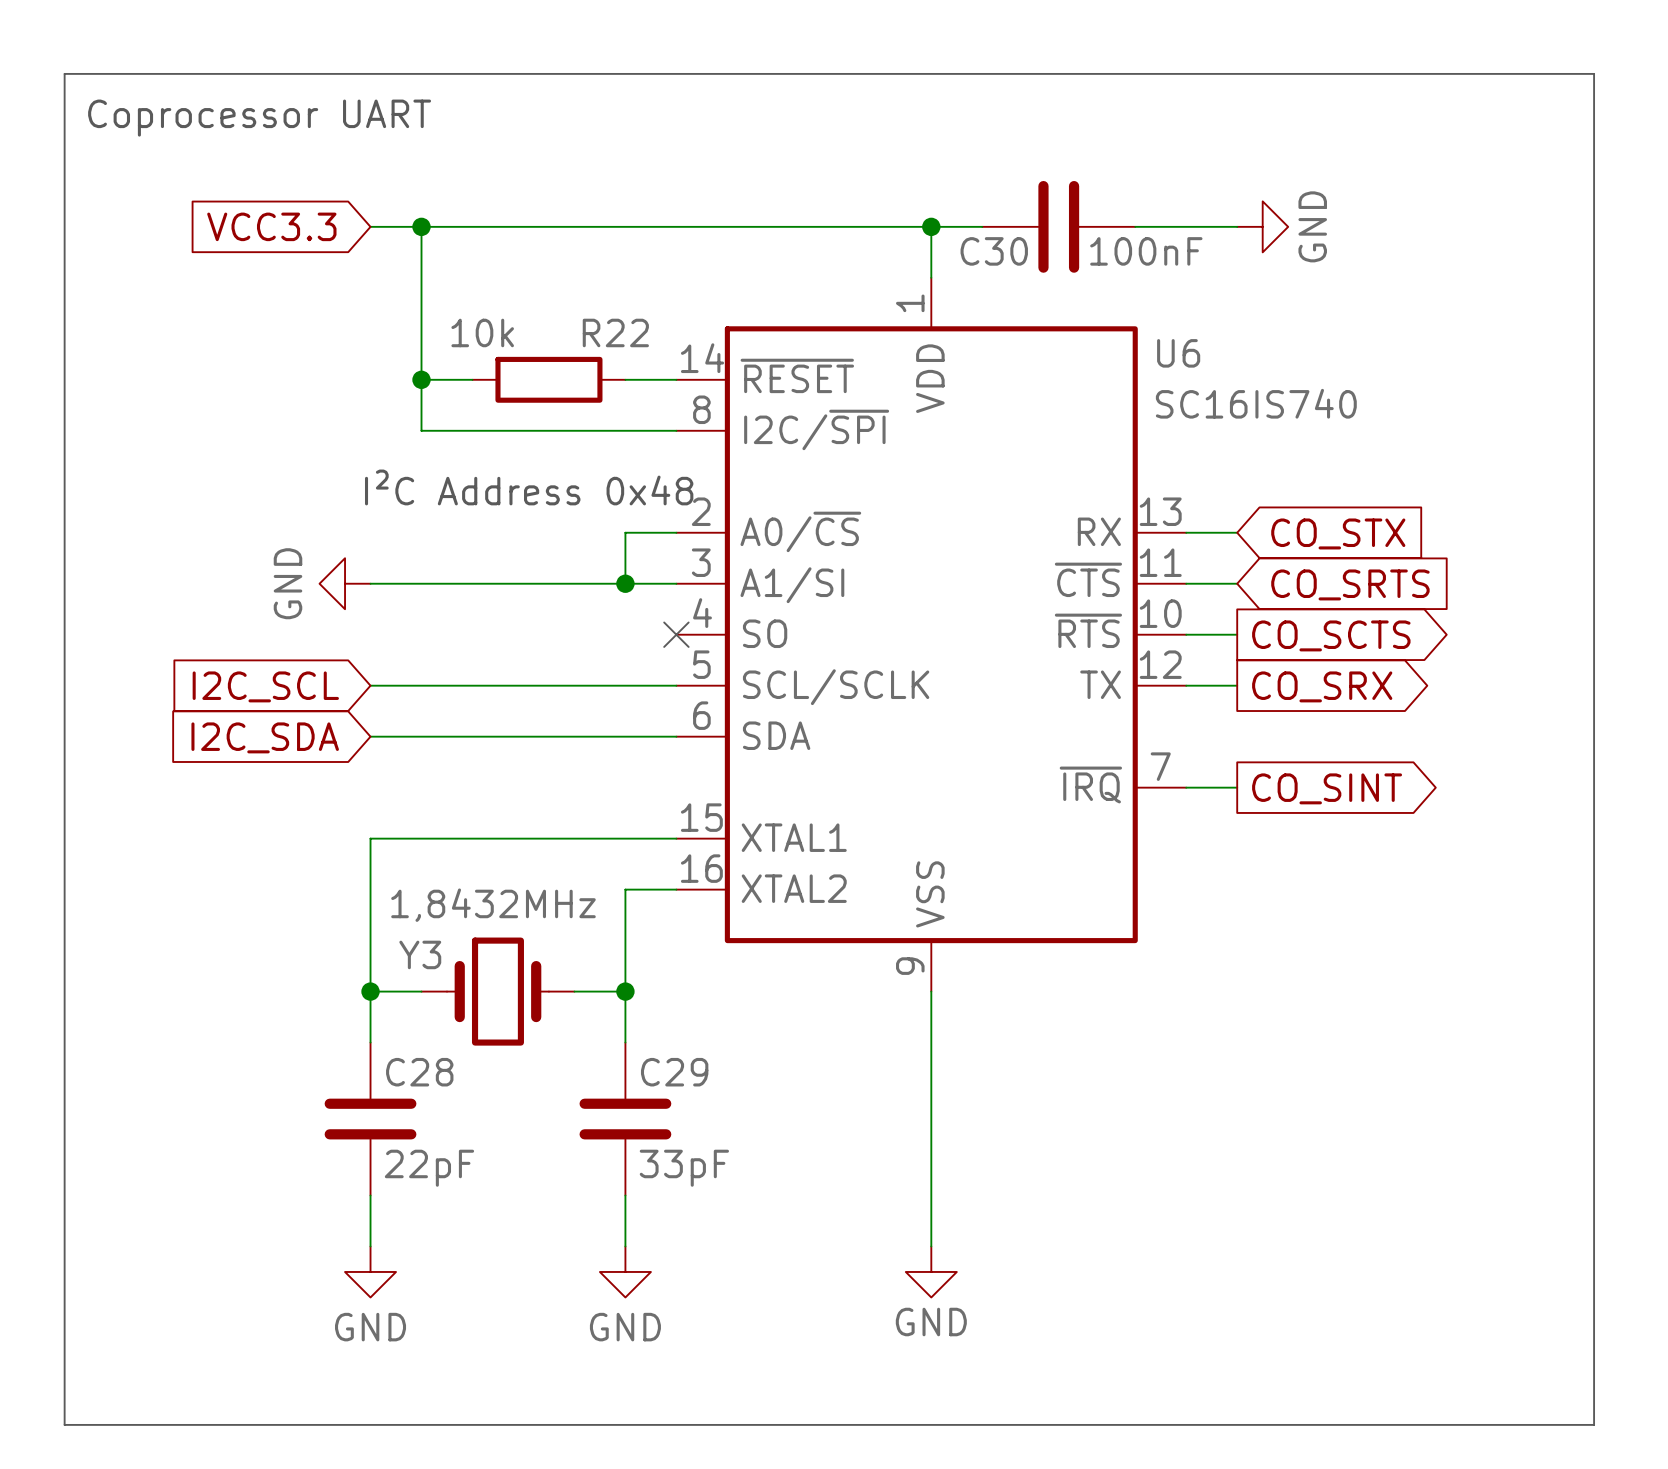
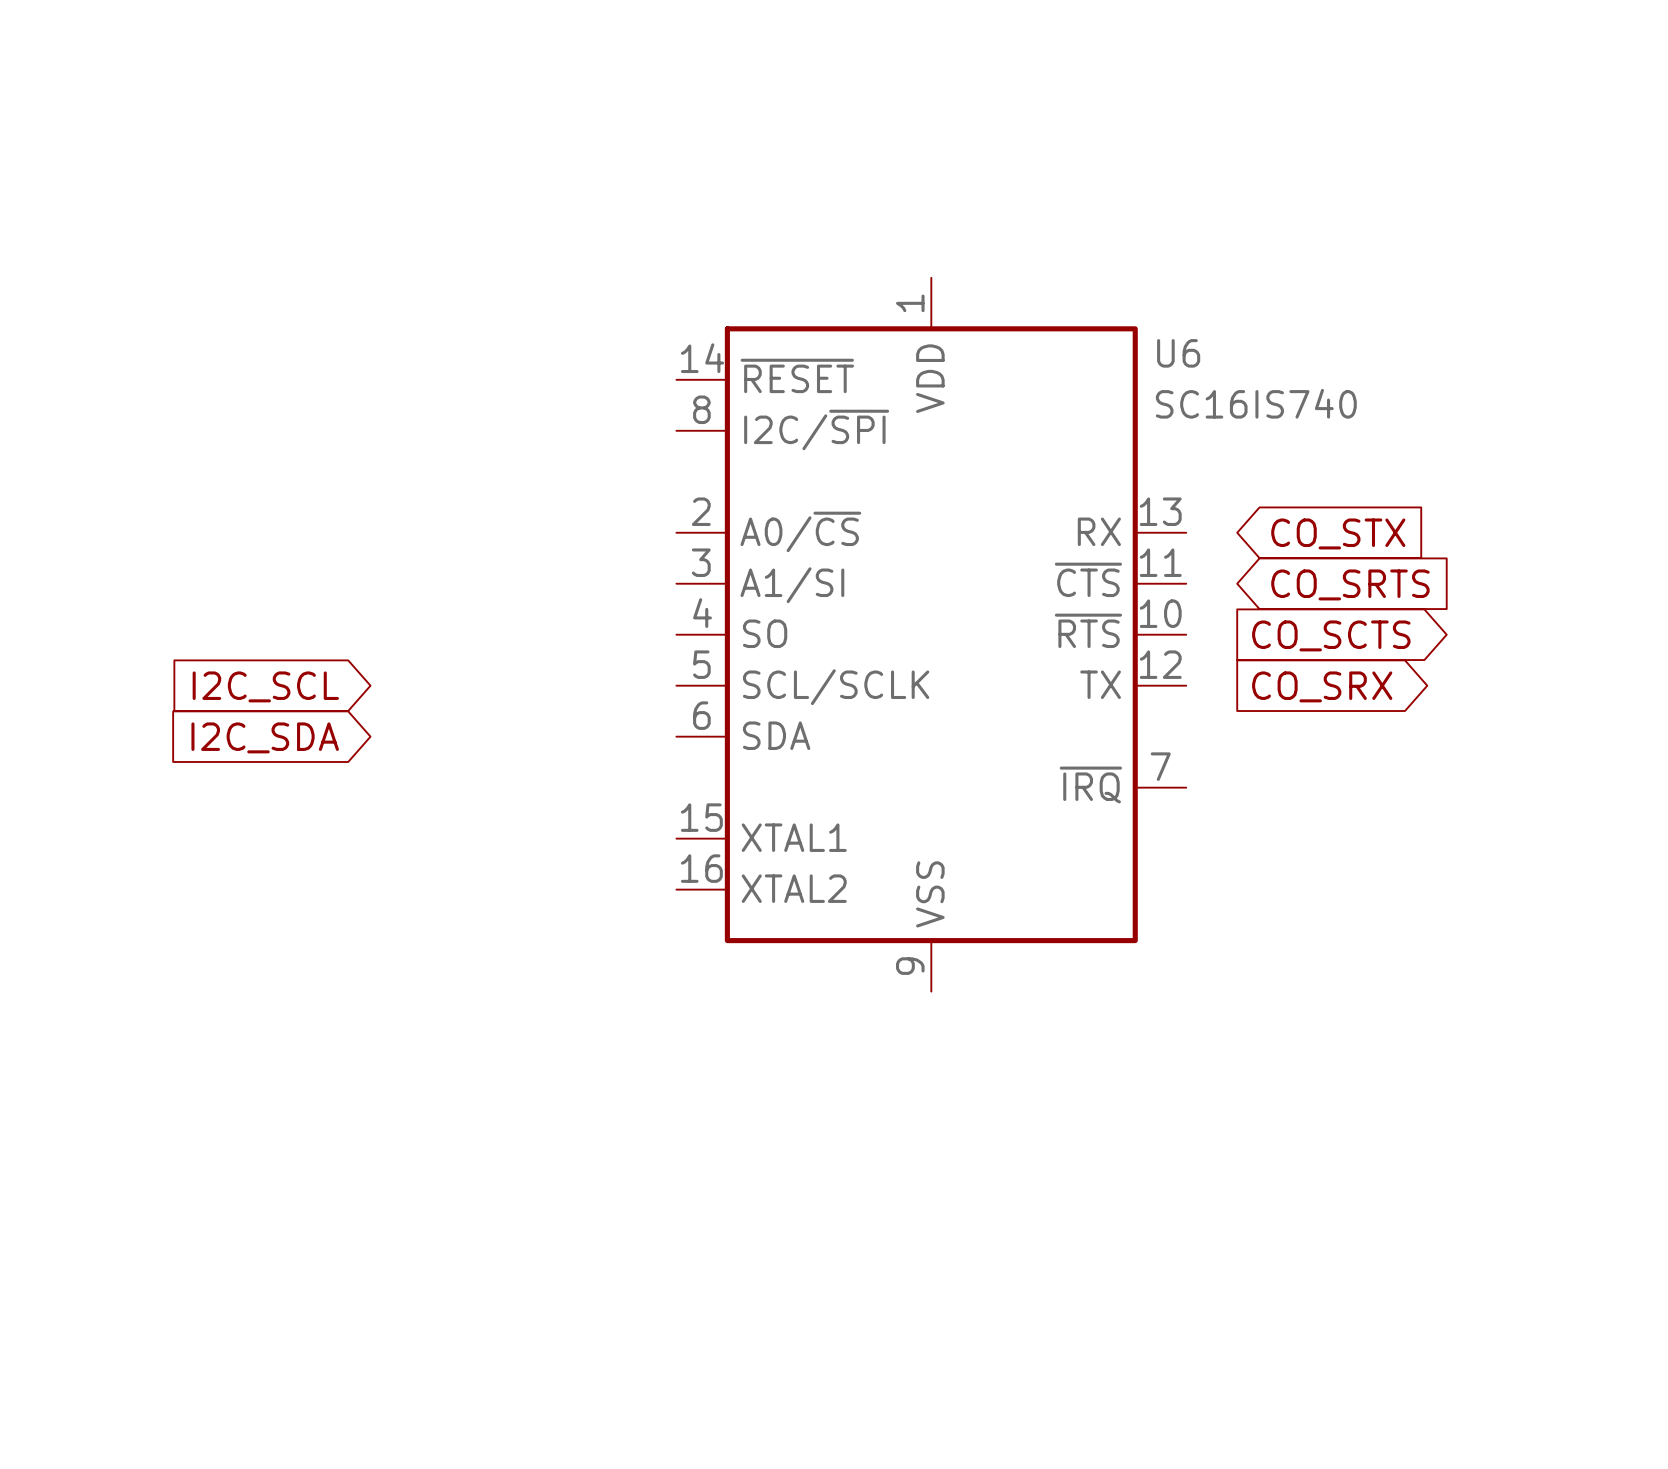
line: (64, 73) (1594, 73) (1594, 1424) (64, 1424) (64, 73) -> none
text: Coprocessor UART (259, 118) -> none
global label: VCC3.3 (271, 226) -> none
wire: (370, 226) (982, 226) -> none
wire: (421, 226) (421, 430) (676, 430) -> none
junction: (421, 226) -> none
wire: (931, 226) (931, 277) -> none
junction: (931, 226) -> none
C30: 100nF (1058, 226) -> none
wire: (1135, 226) (1237, 226) -> none
power symbol: GND (1262, 226) -> none
wire: (421, 379) (472, 379) -> none
junction: (421, 379) -> none
R22: 10k (548, 379) -> none
wire: (625, 379) (676, 379) -> none
text: I²C Address 0x48 (529, 487) -> none
wire: (676, 532) (625, 532) (625, 583) -> none
wire: (1186, 532) (1237, 532) -> none
power symbol: GND (345, 583) -> none
wire: (370, 583) (676, 583) -> none
junction: (625, 583) -> none
wire: (1186, 583) (1237, 583) -> none
no-connect mark: (676, 634) -> none
wire: (1186, 634) (1237, 634) -> none
wire: (370, 685) (676, 685) -> none
wire: (1186, 685) (1237, 685) -> none
wire: (370, 736) (676, 736) -> none
wire: (1186, 787) (1237, 787) -> none
global label: CO_SINT (1327, 788) -> none
wire: (676, 838) (370, 838) (370, 1042) -> none
wire: (676, 889) (625, 889) (625, 1042) -> none
wire: (370, 991) (421, 991) -> none
junction: (370, 991) -> none
Y3: 1,8432MHz (497, 991) -> none
wire: (574, 991) (625, 991) -> none
junction: (625, 991) -> none
wire: (931, 991) (931, 1246) -> none
C28: 22pF (370, 1119) -> none
C29: 33pF (625, 1119) -> none
wire: (370, 1195) (370, 1246) -> none
wire: (625, 1195) (625, 1246) -> none
power symbol: GND (370, 1271) -> none
power symbol: GND (625, 1271) -> none
power symbol: GND (931, 1271) -> none

